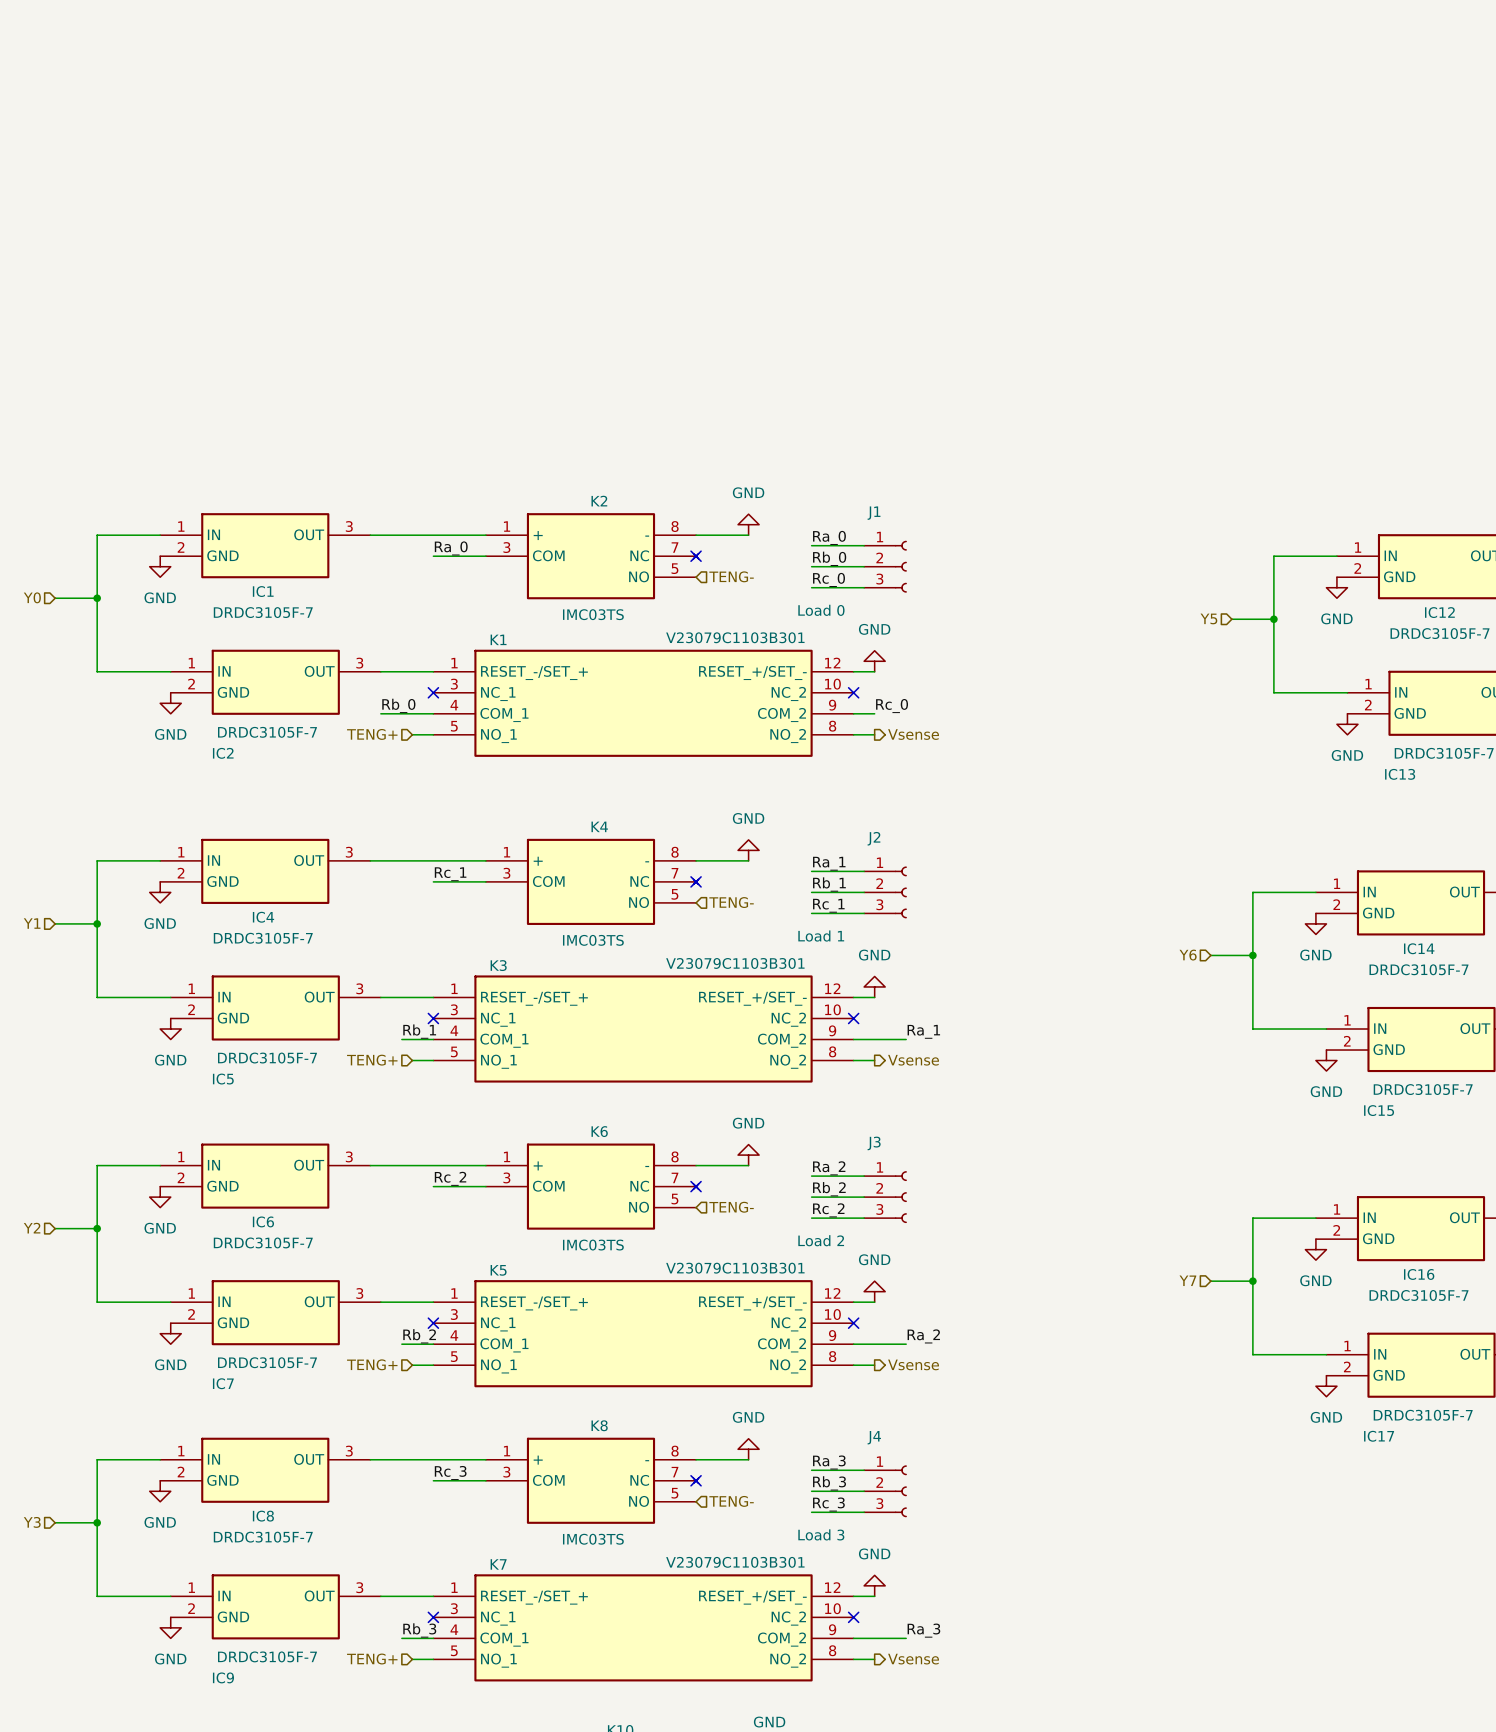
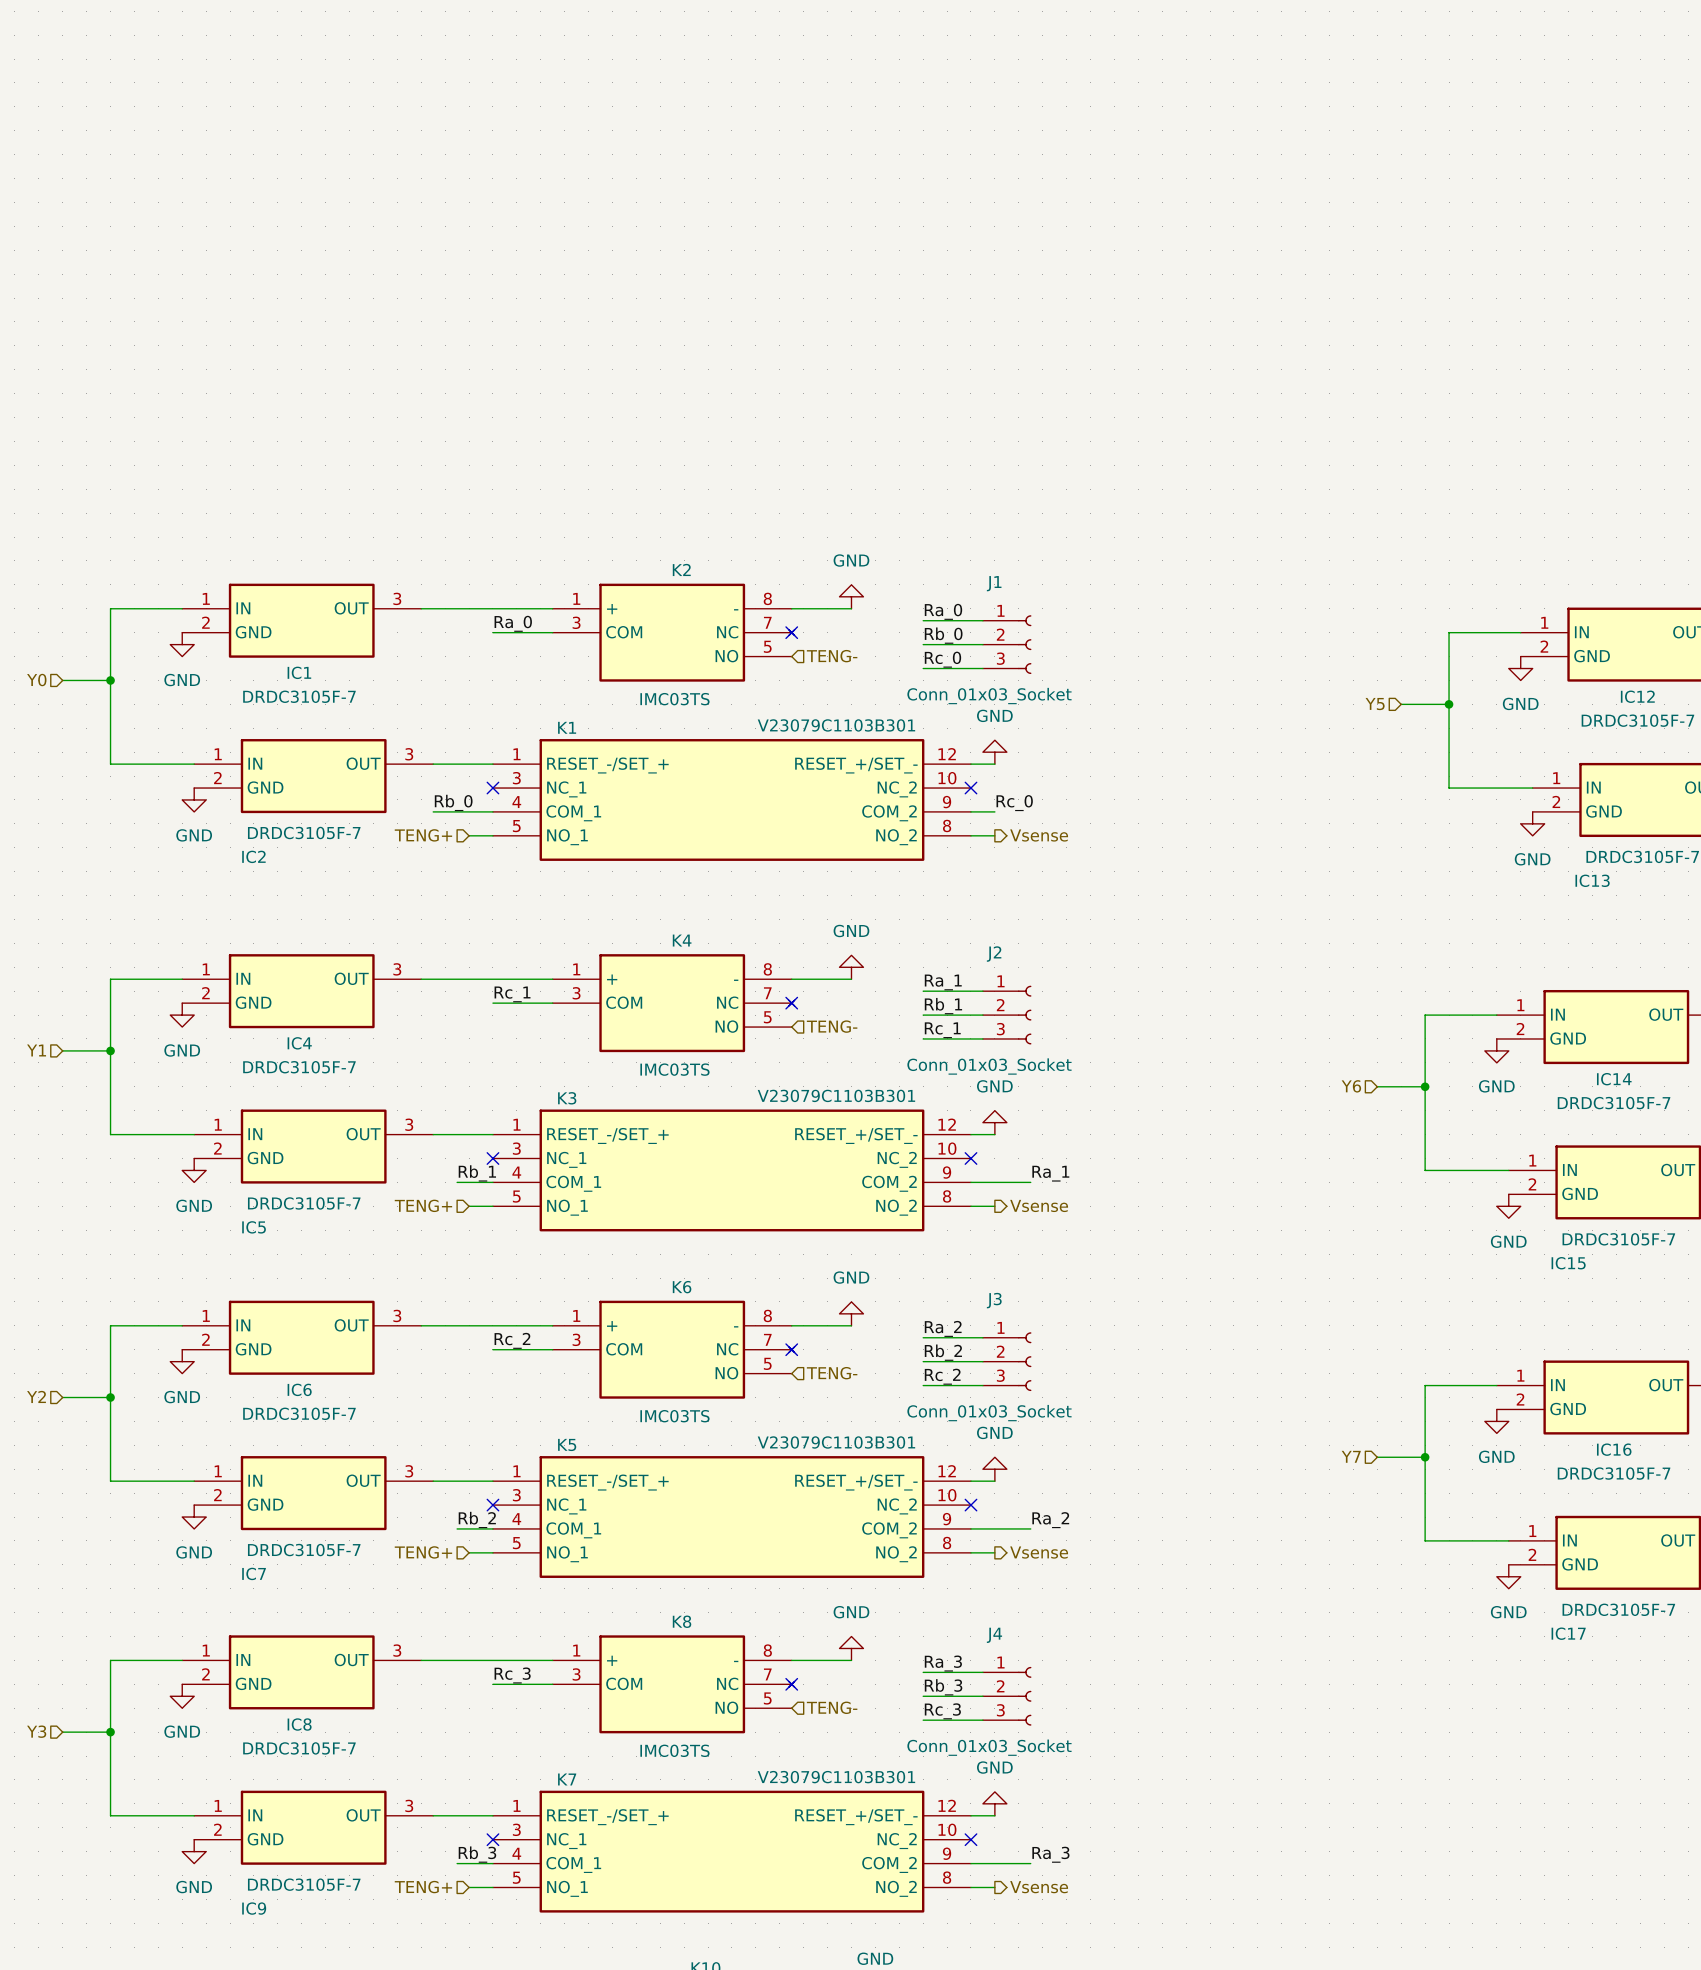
J1 value: Load 0 (821, 610) -> Conn_01x03_Socket (989, 696)
J2 value: Load 1 (821, 936) -> Conn_01x03_Socket (989, 1066)
J3 value: Load 2 (821, 1240) -> Conn_01x03_Socket (989, 1413)
J4 value: Load 3 (821, 1534) -> Conn_01x03_Socket (989, 1747)

